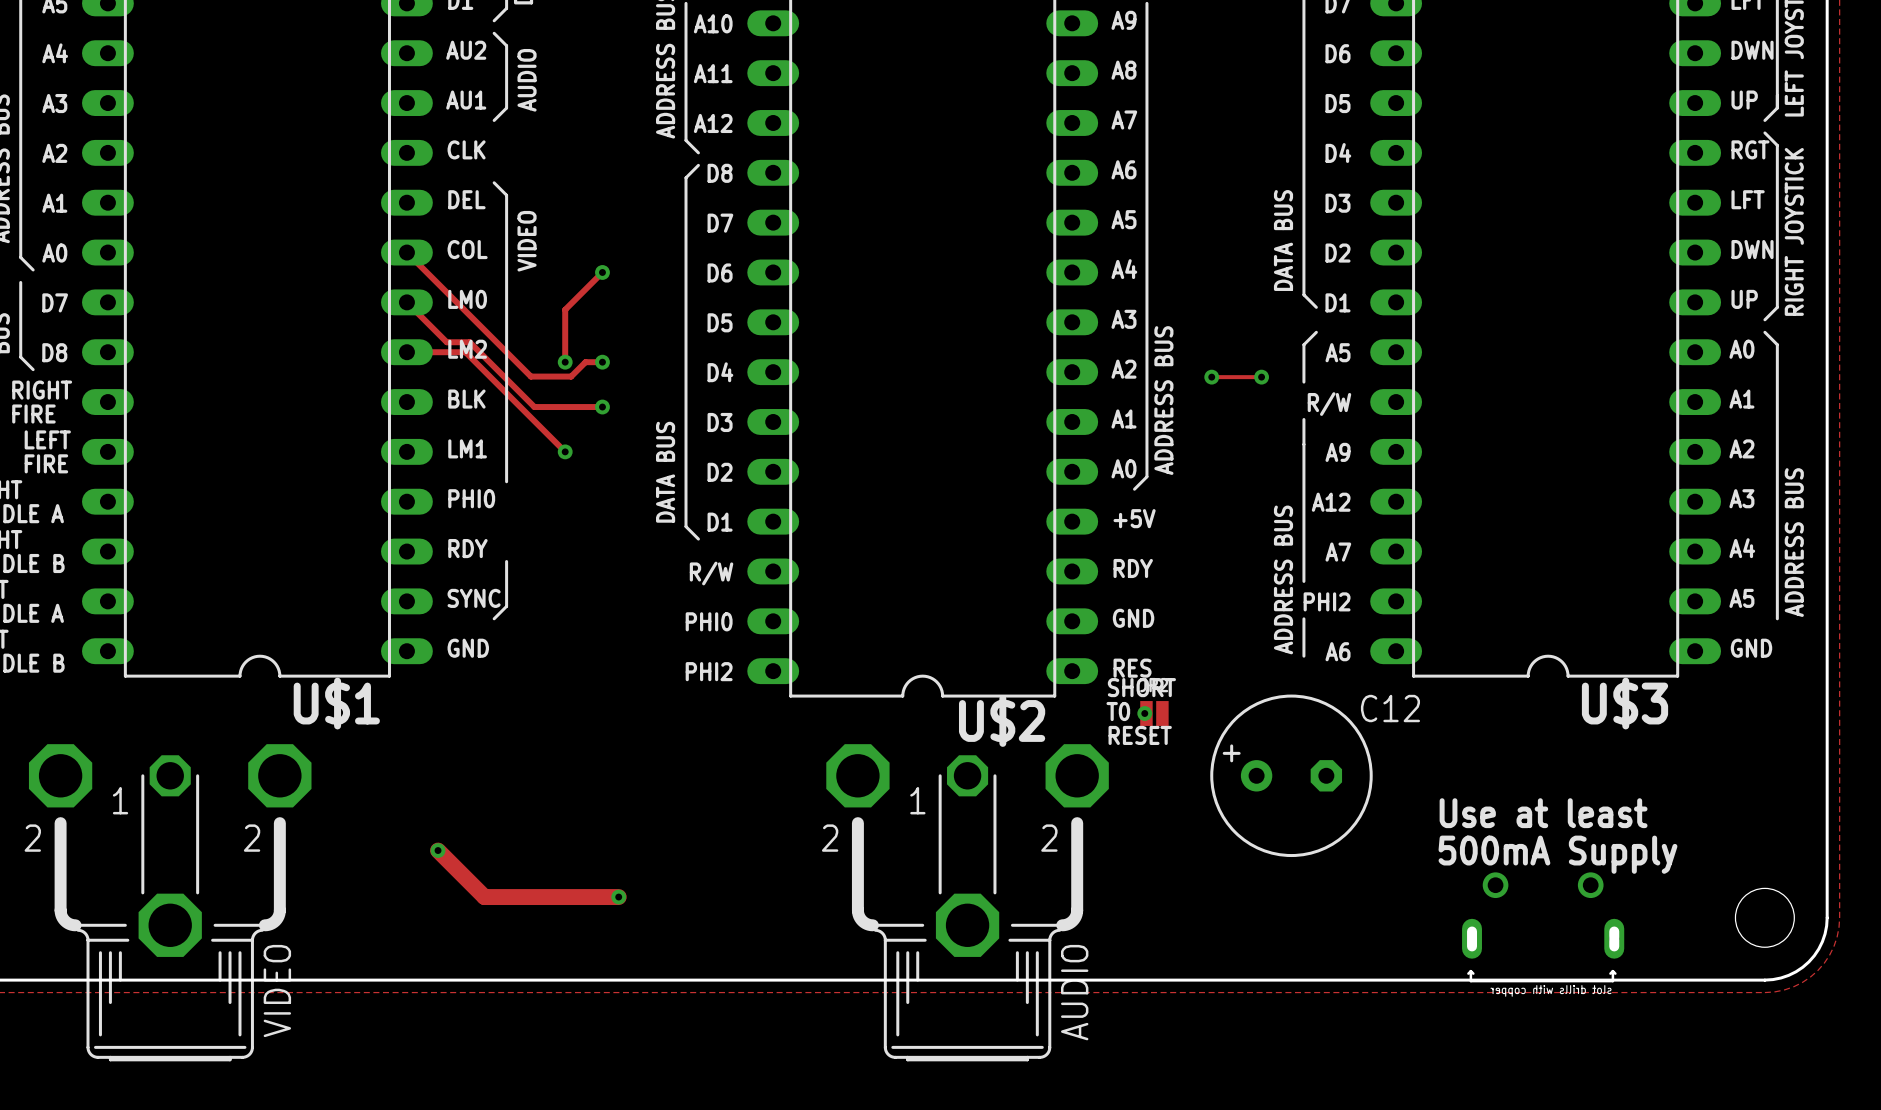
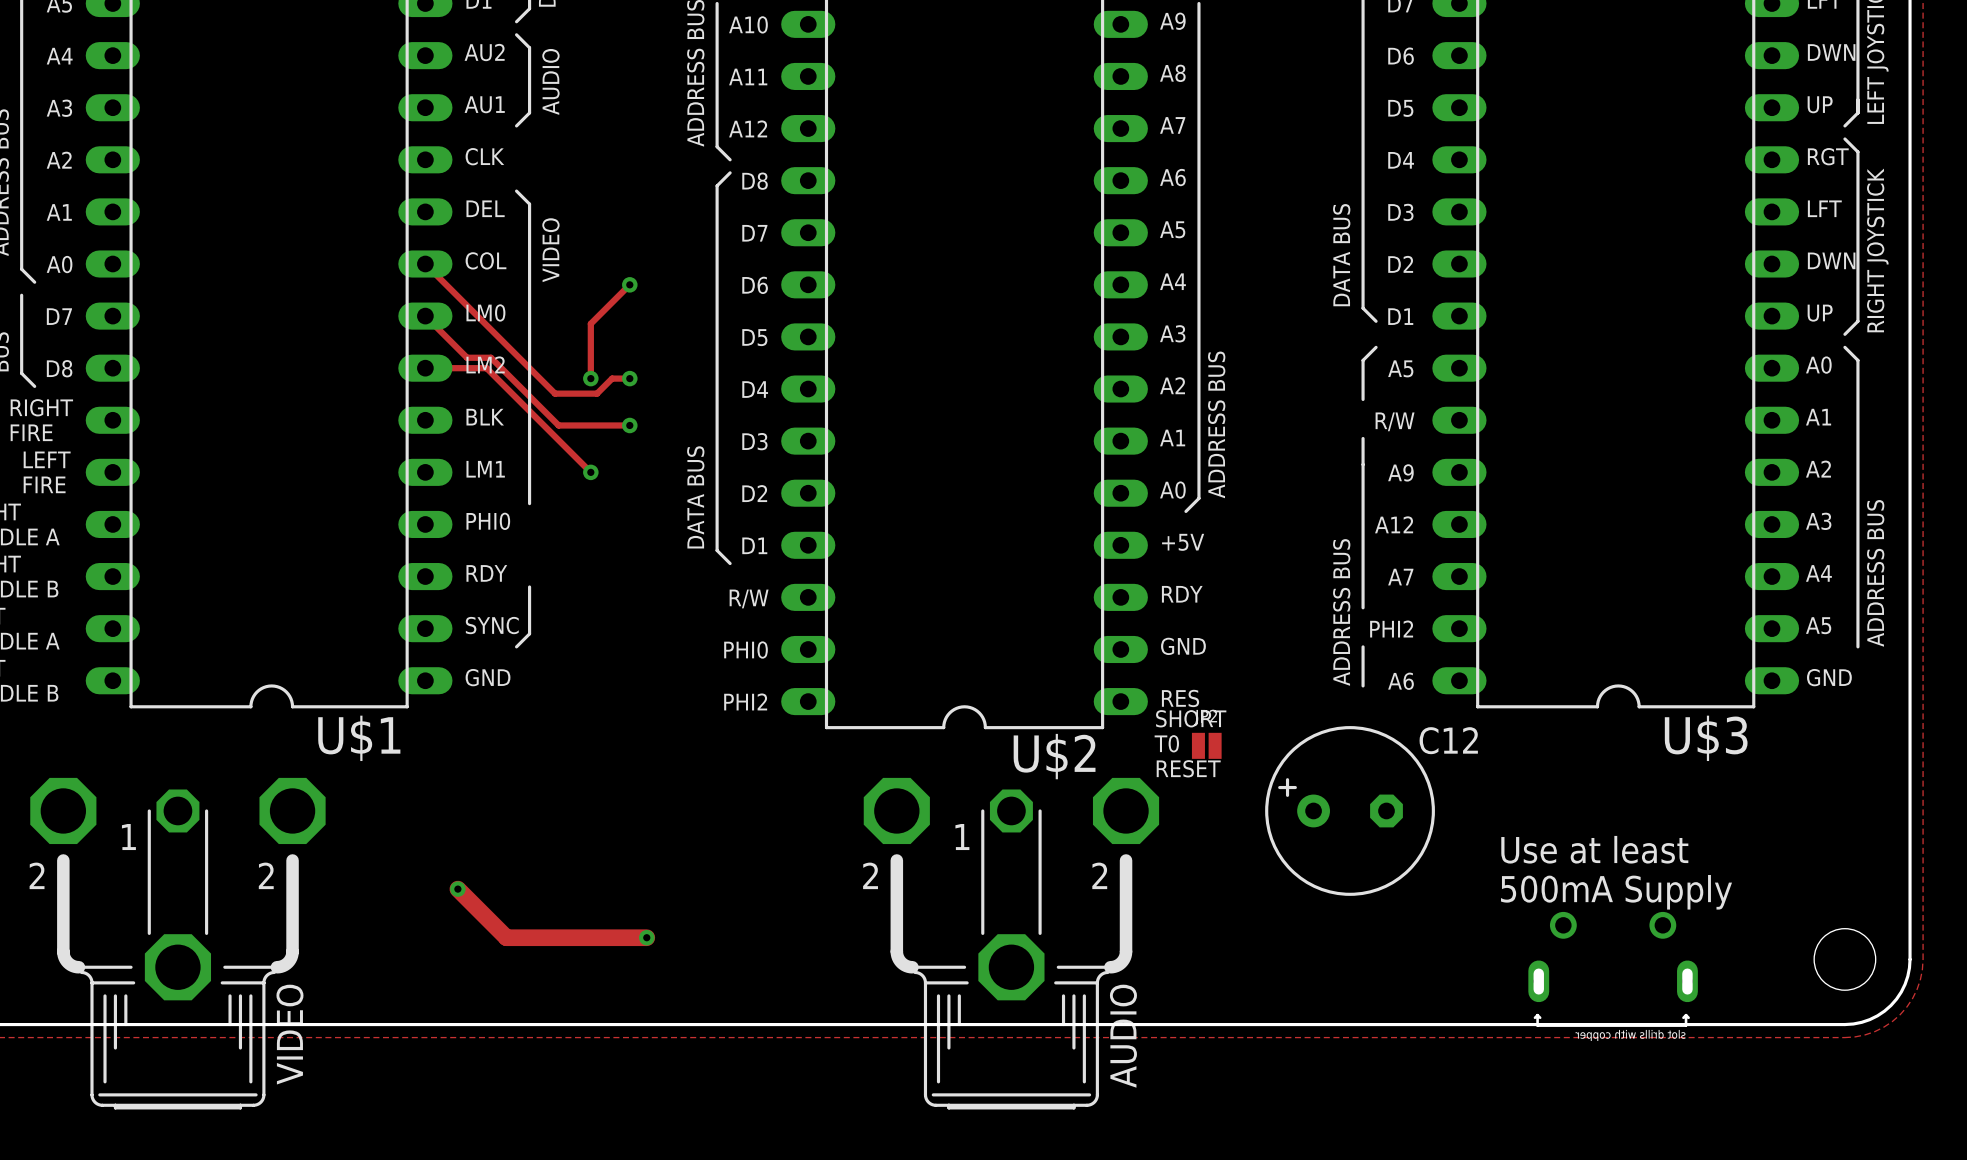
track: (1211, 377) (1261, 377) -> none
via: (1211, 377) -> none
via: (1261, 377) -> none
via: (1144, 713) -> none

